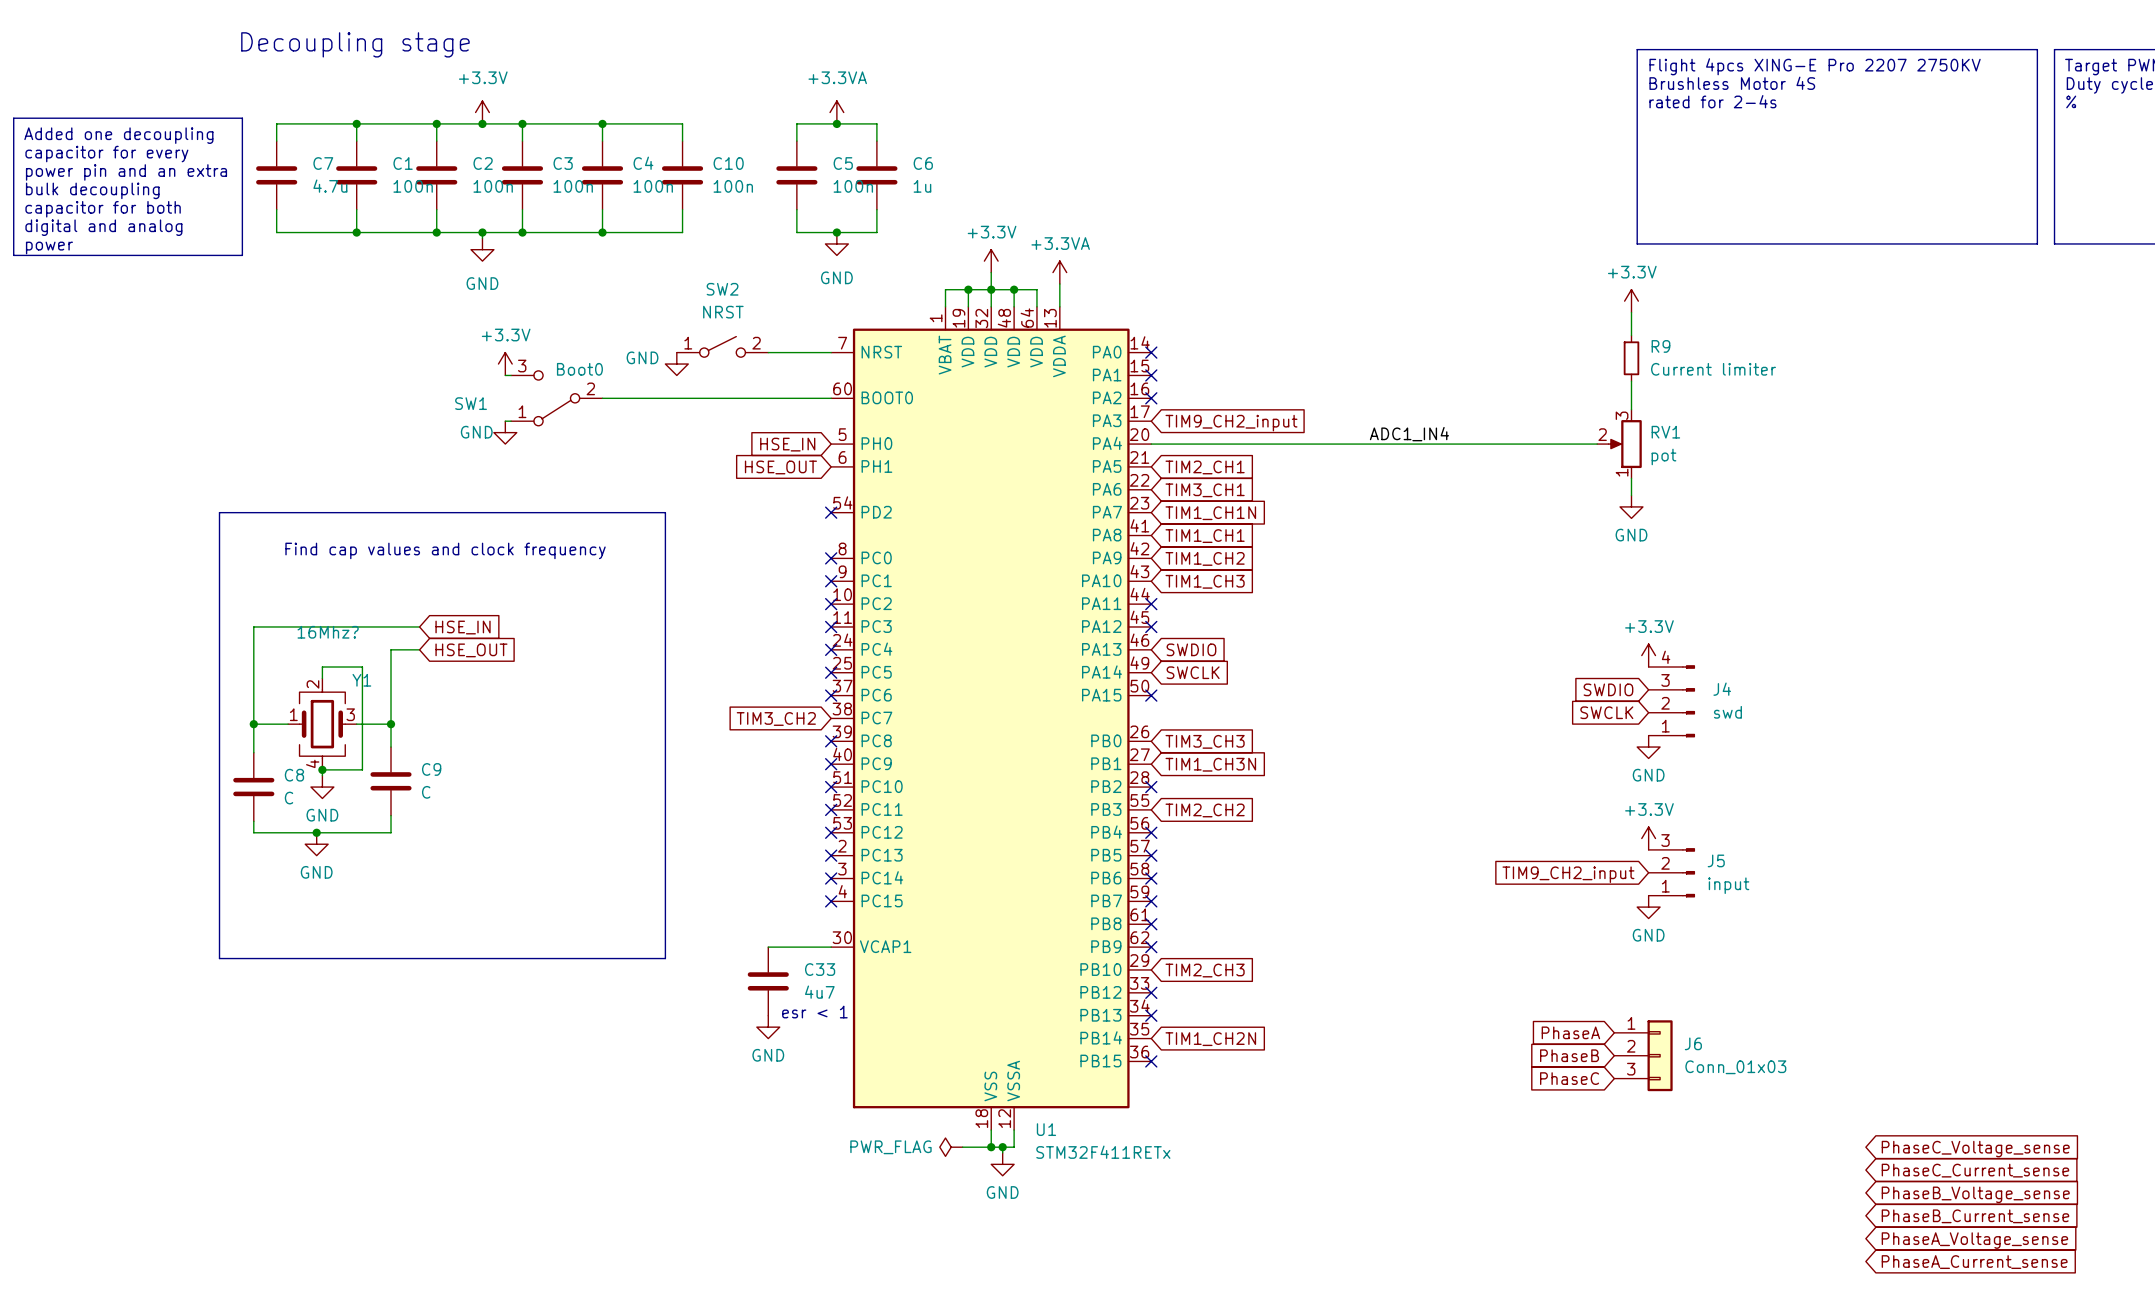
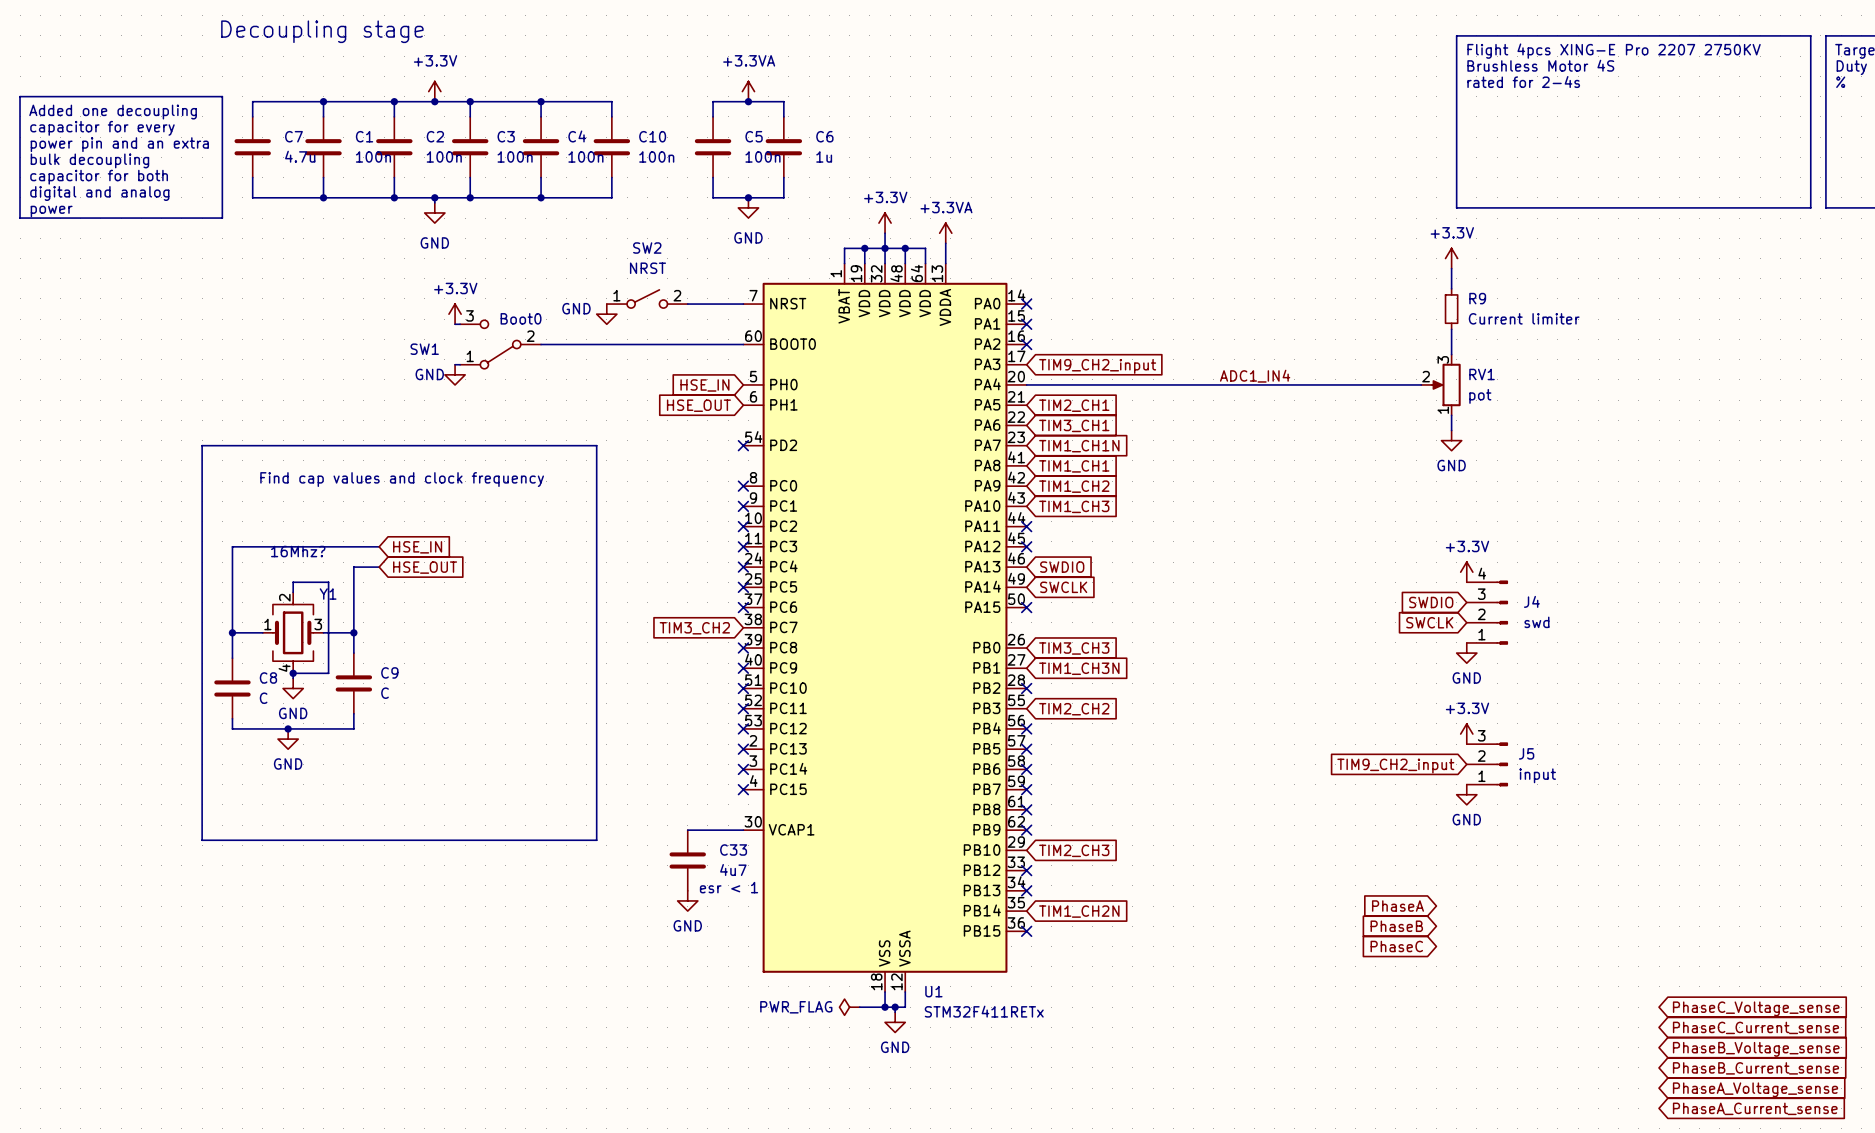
J6: Conn_01x03 (1643, 1055) -> none

